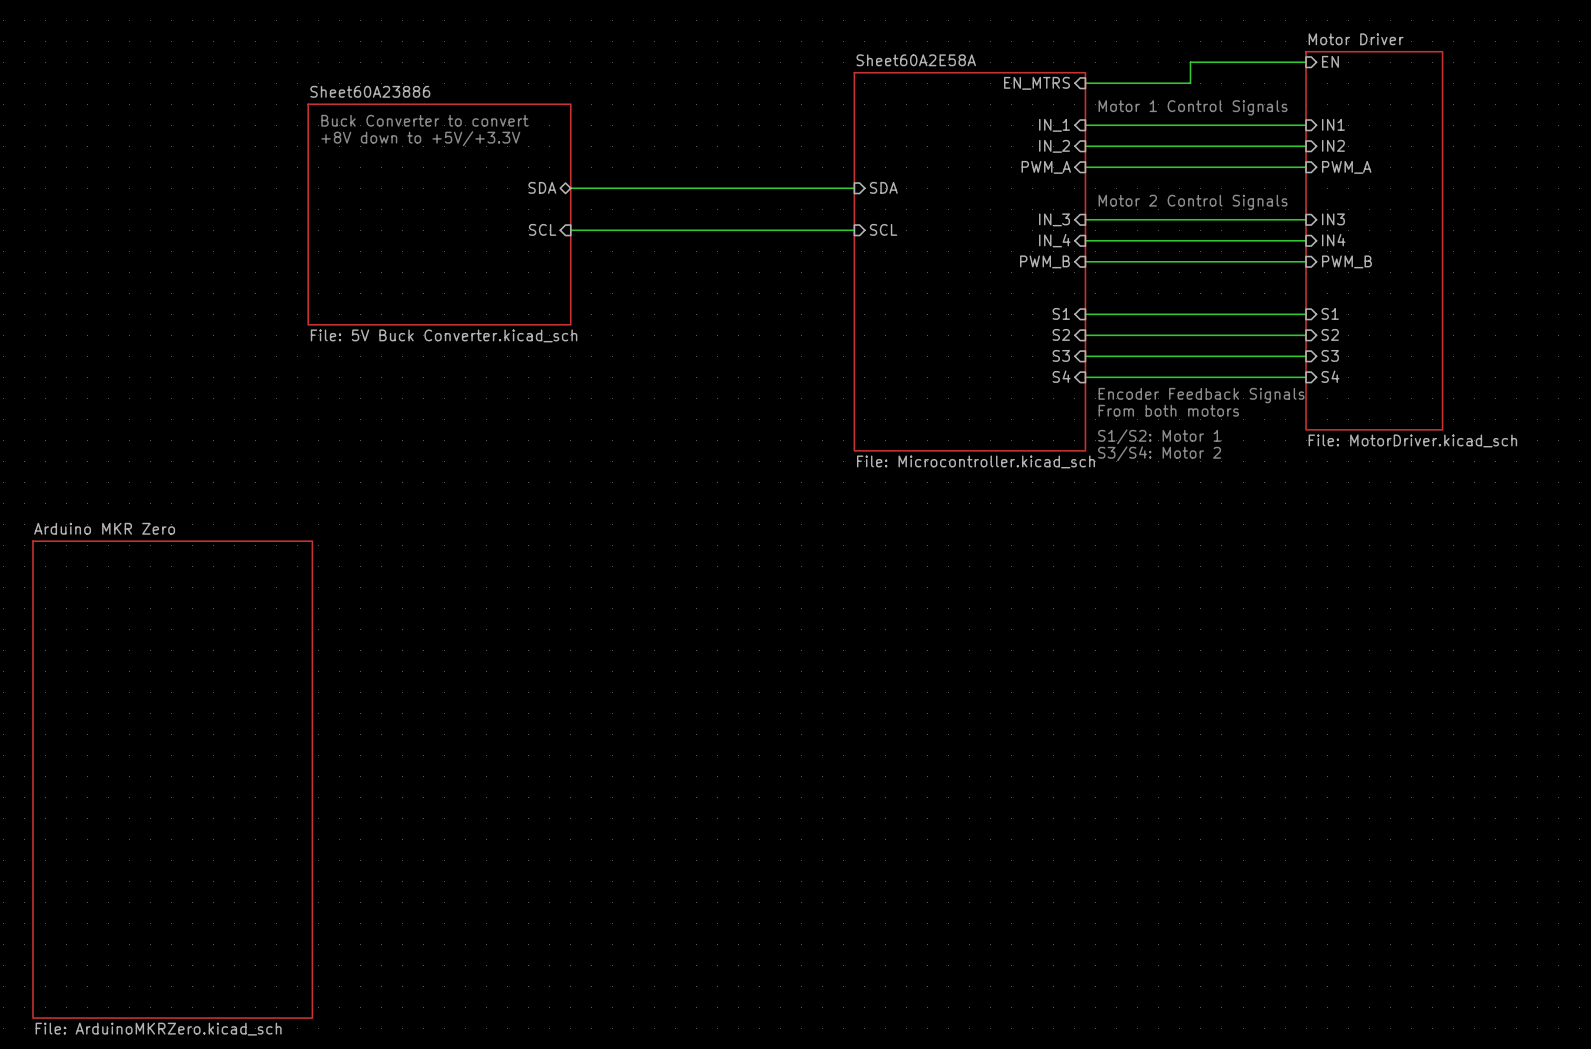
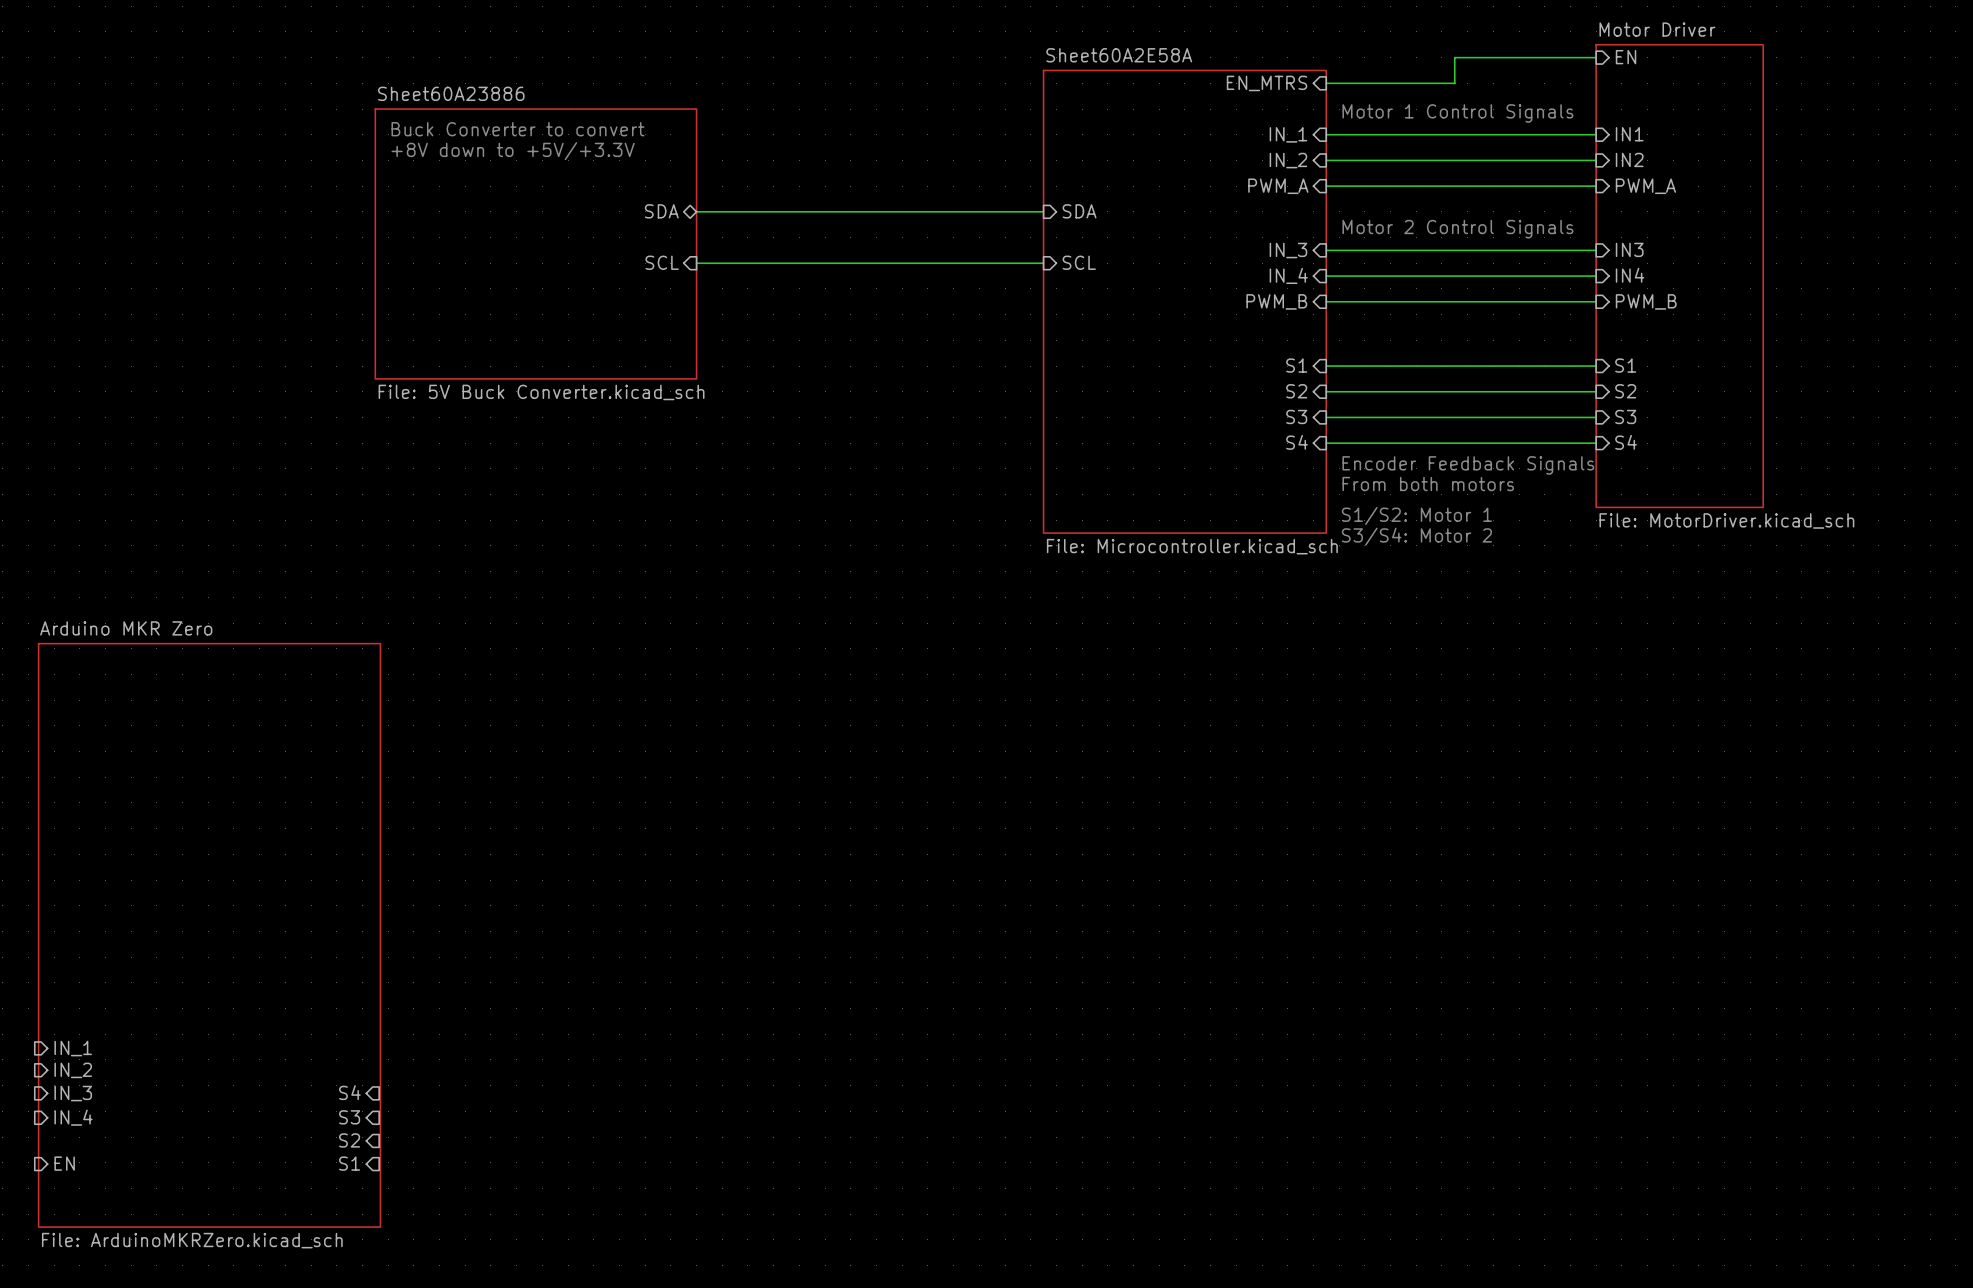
sheet pin: none -> IN_1 (73, 1048)
sheet pin: none -> IN_2 (73, 1070)
sheet pin: none -> IN_3 (73, 1093)
sheet pin: none -> S4 (349, 1092)
sheet pin: none -> IN_4 (73, 1117)
sheet pin: none -> S3 (349, 1117)
sheet pin: none -> S2 (349, 1140)
sheet pin: none -> EN (64, 1163)
sheet pin: none -> S1 (349, 1163)

